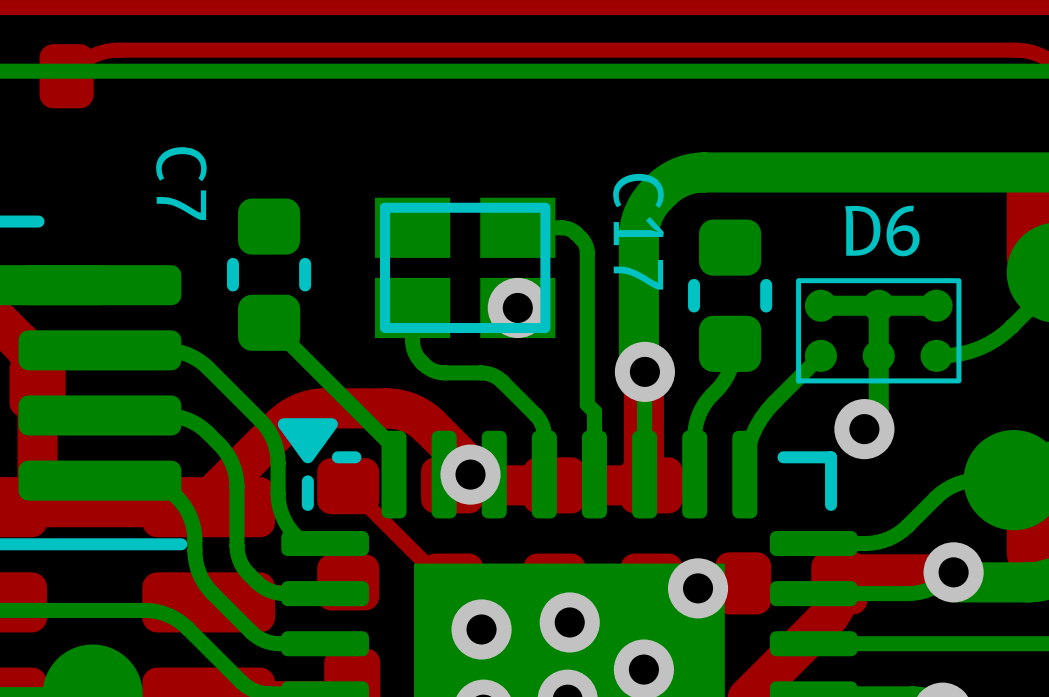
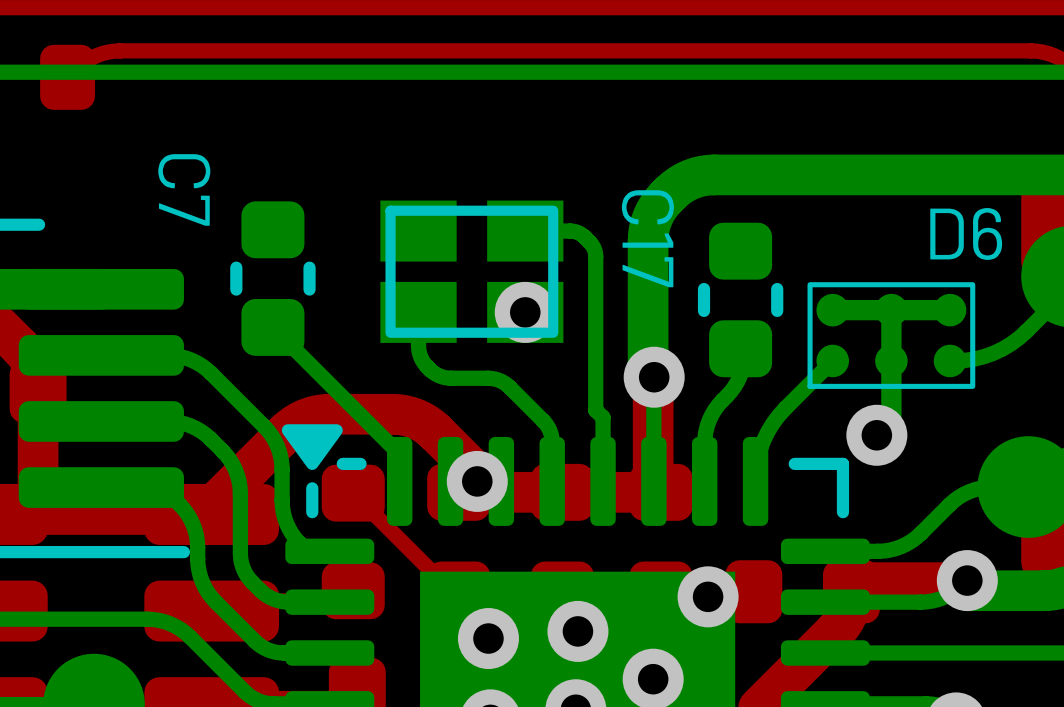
D6 name position: D6 (882, 231) -> D6 (966, 233)

